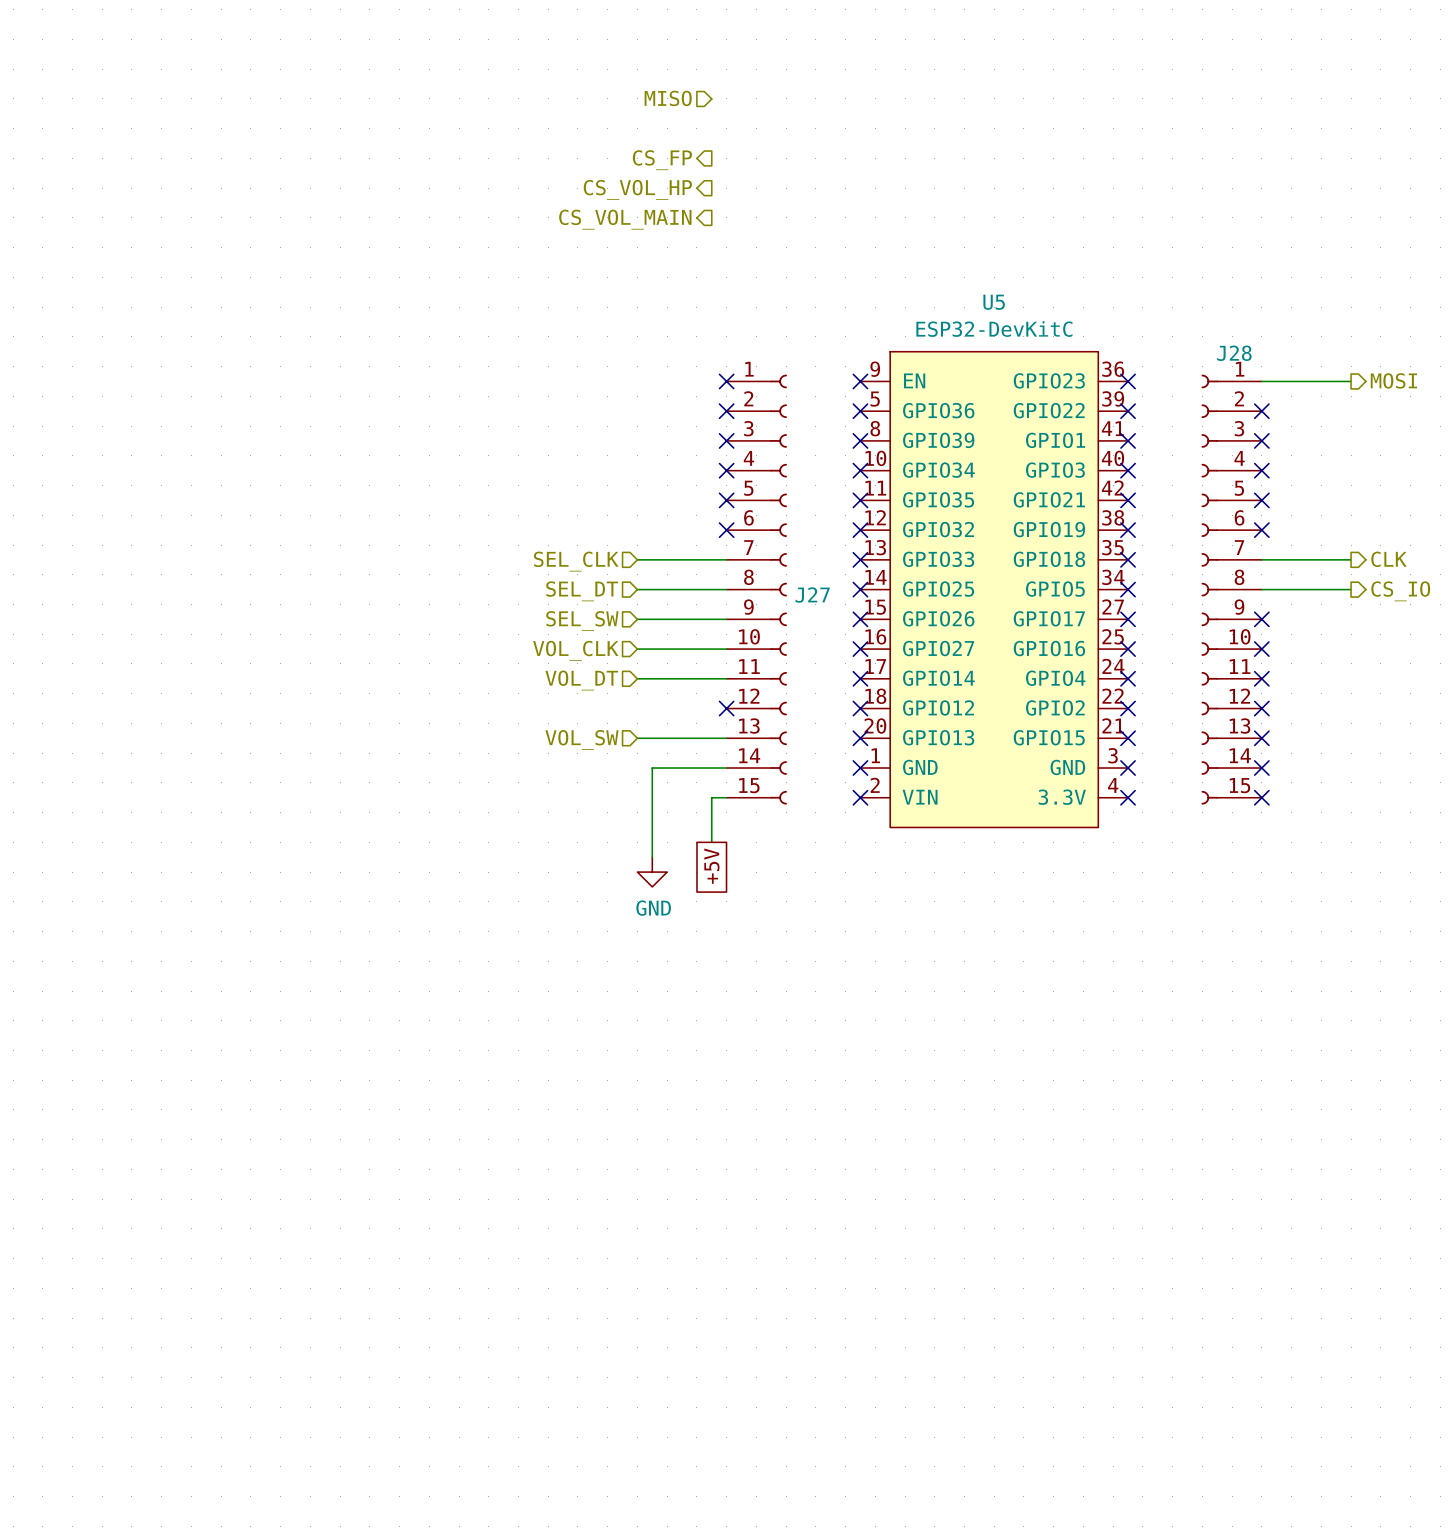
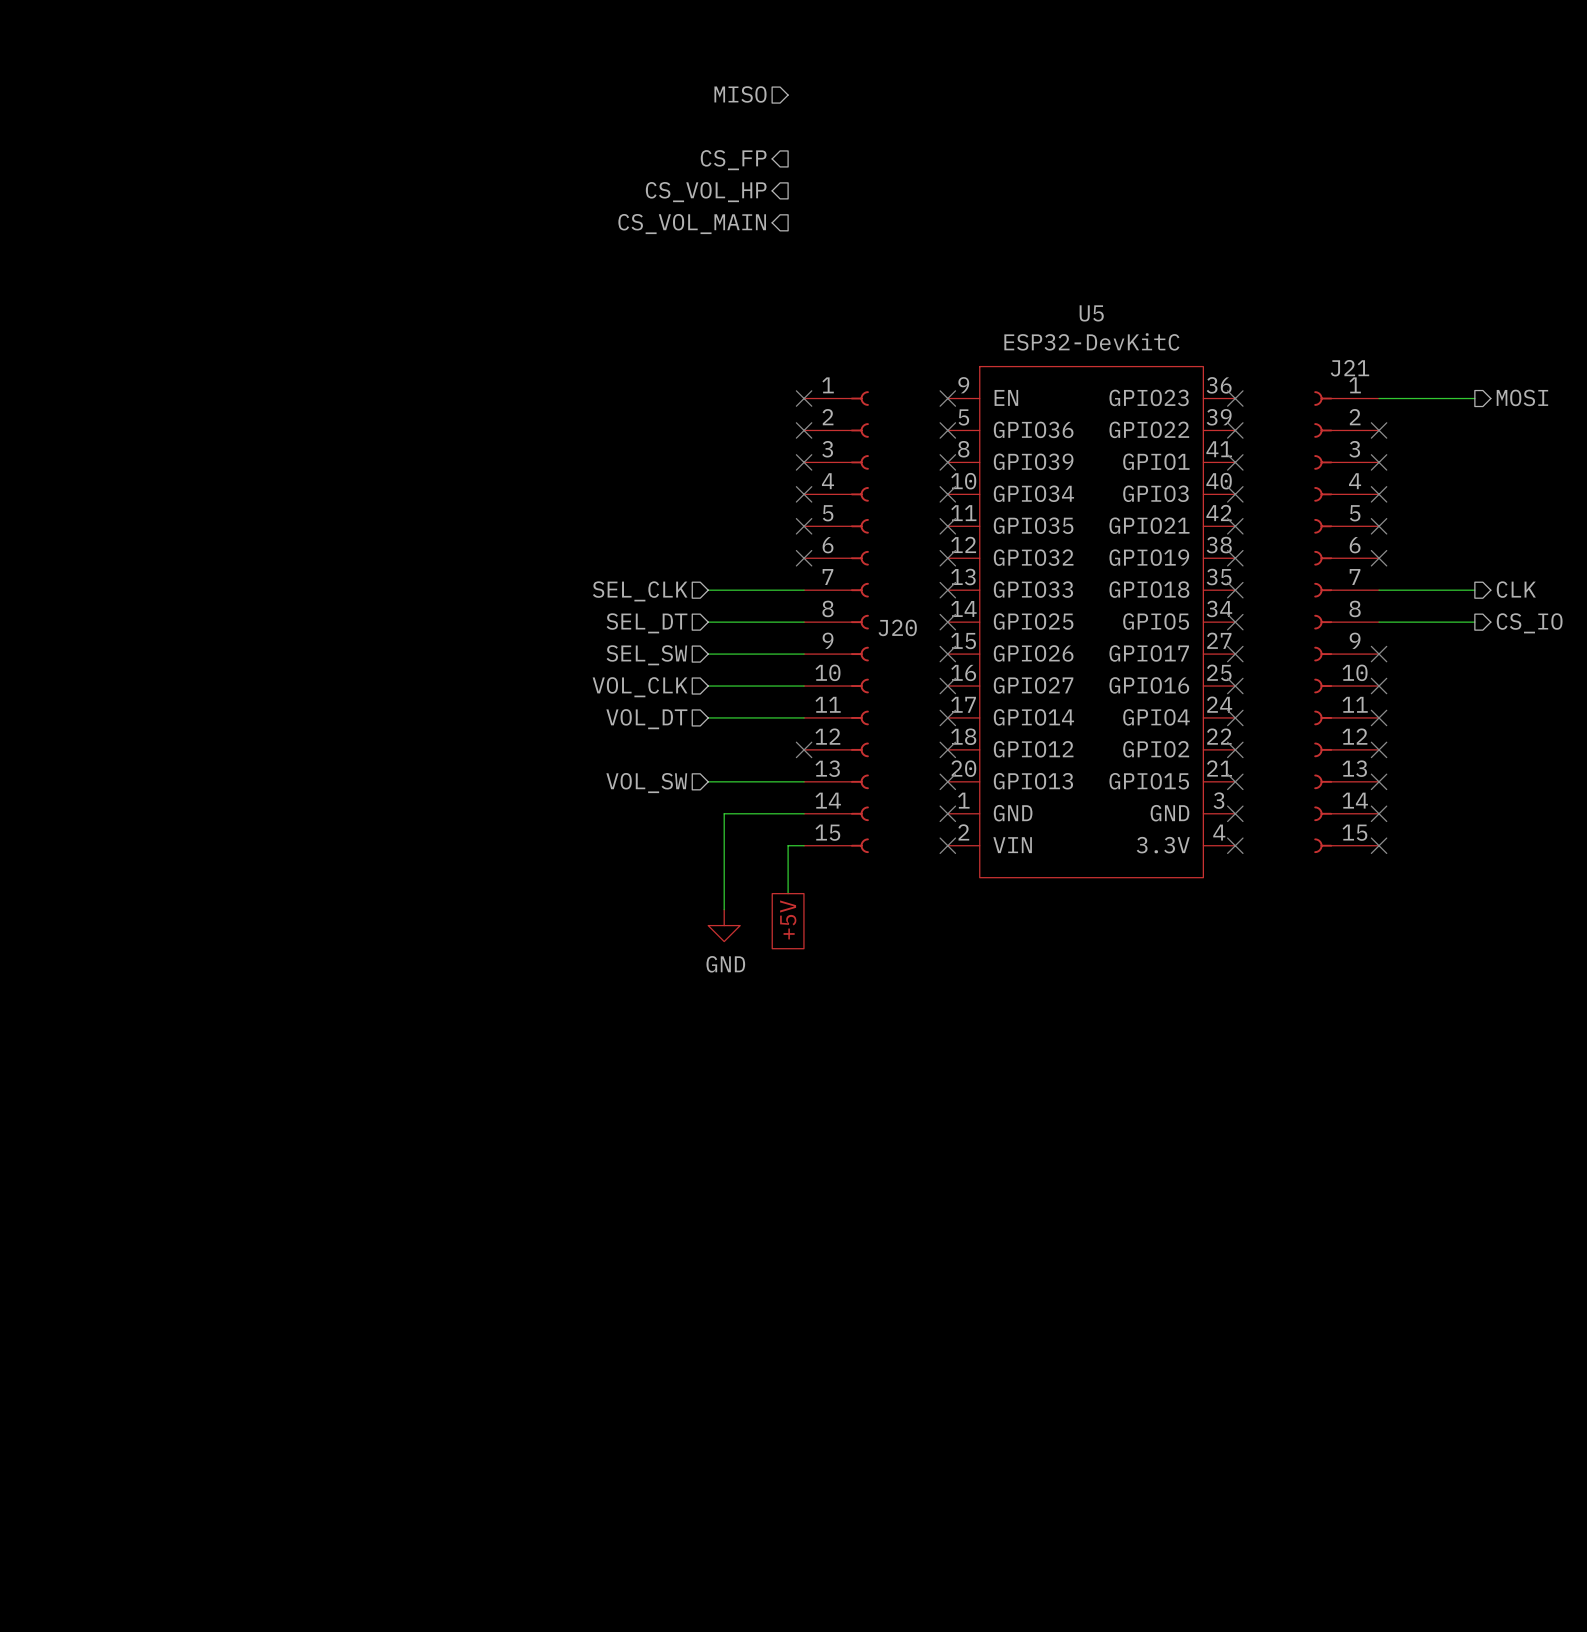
J28 name: J28 (1234, 353) -> J21 (1349, 368)
J27 name: J27 (812, 595) -> J20 (897, 627)

